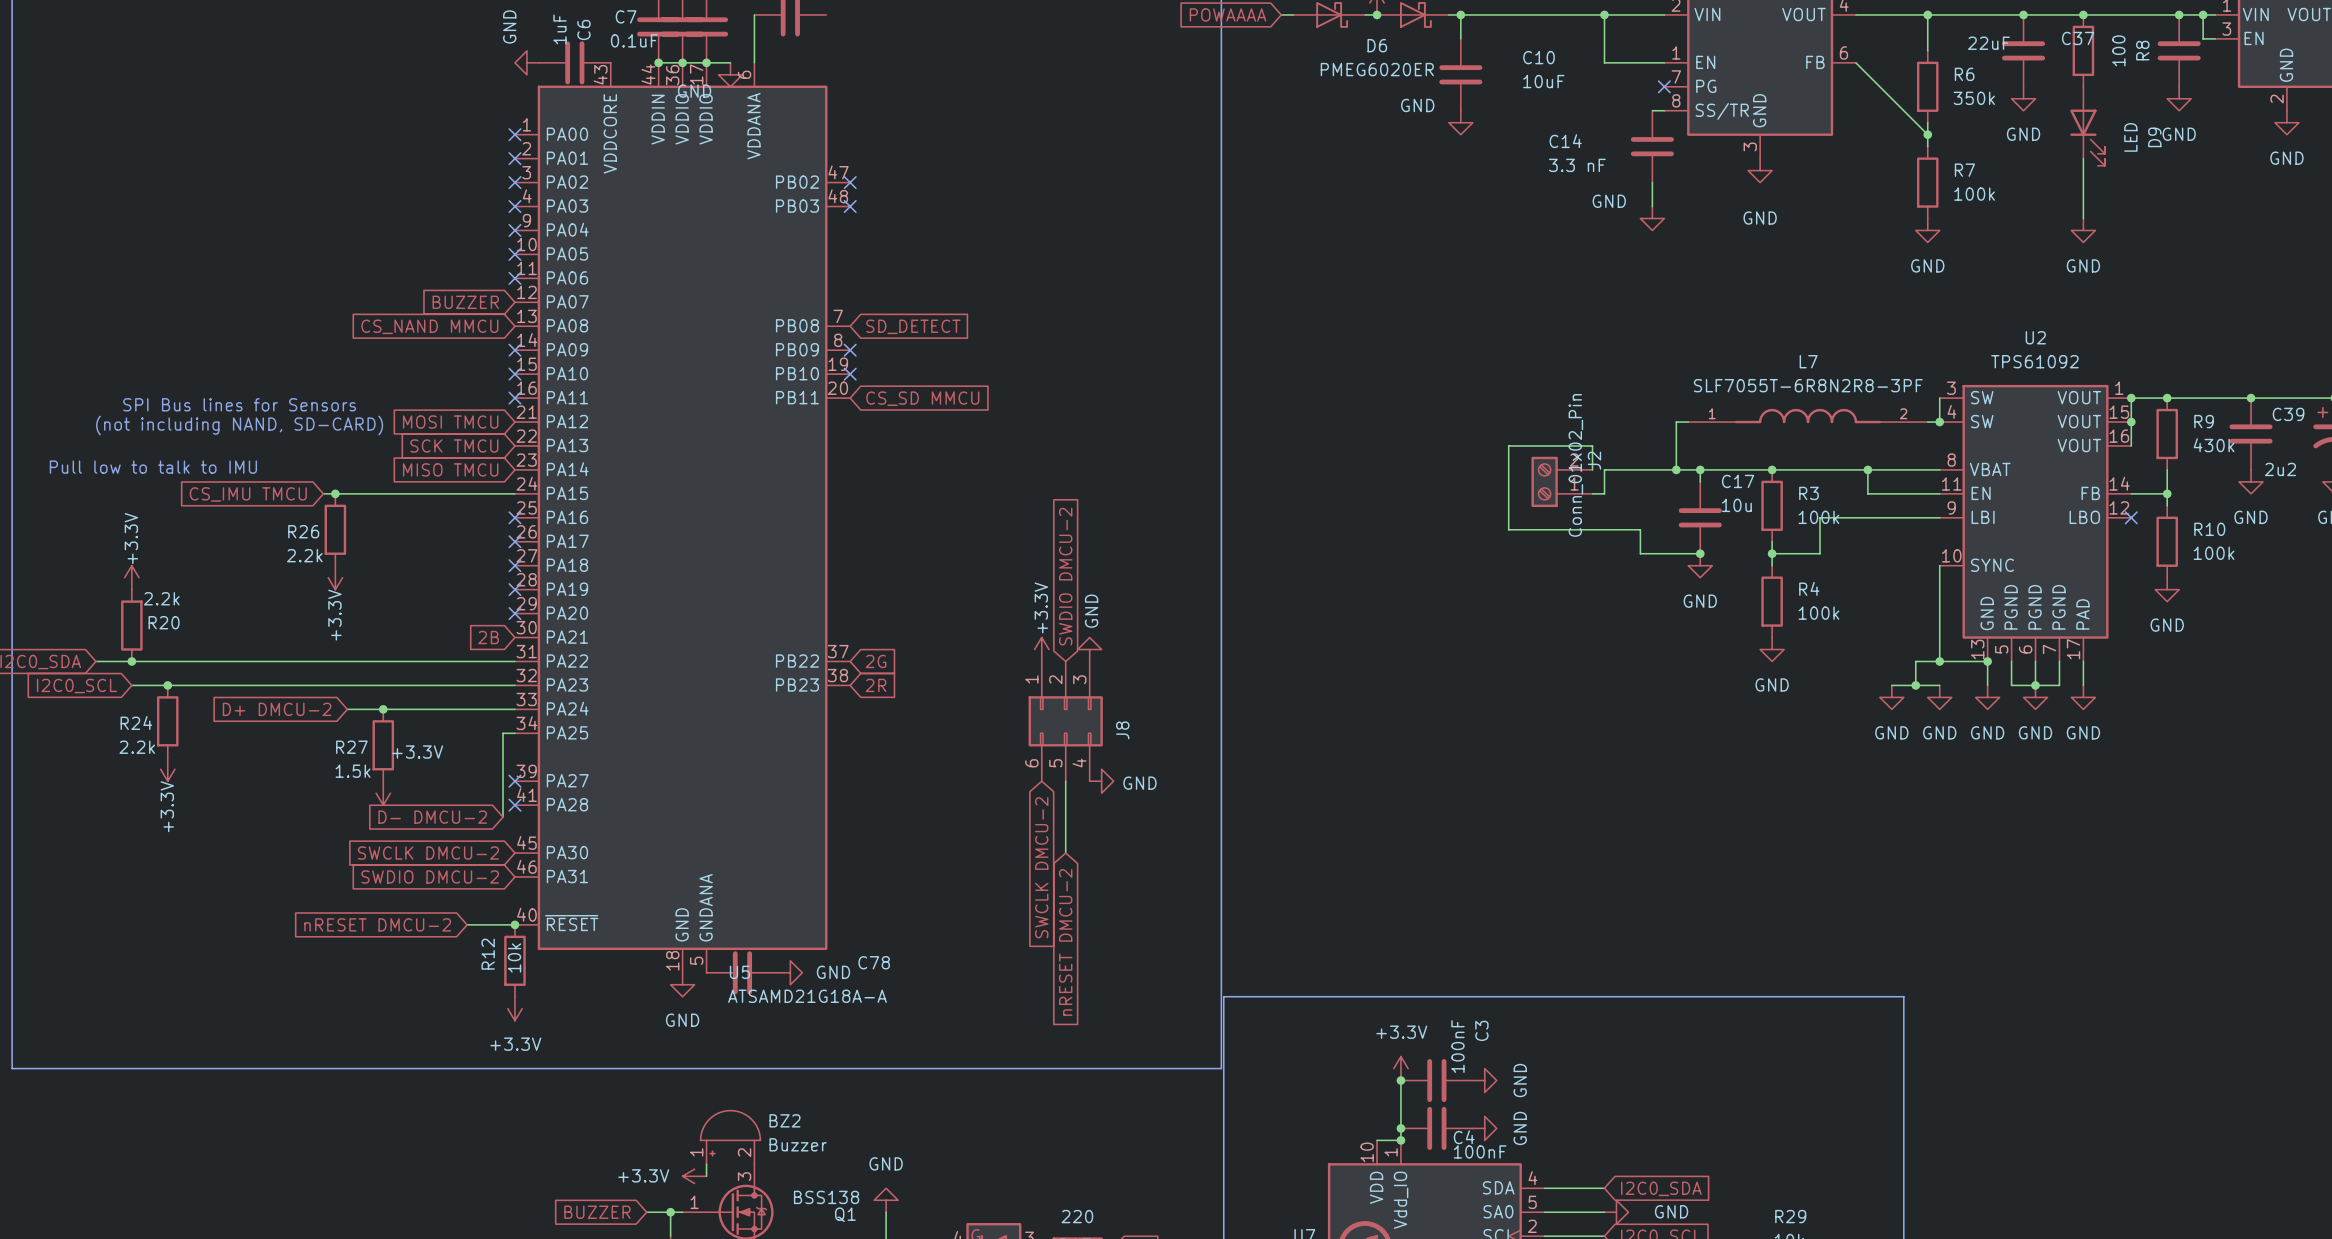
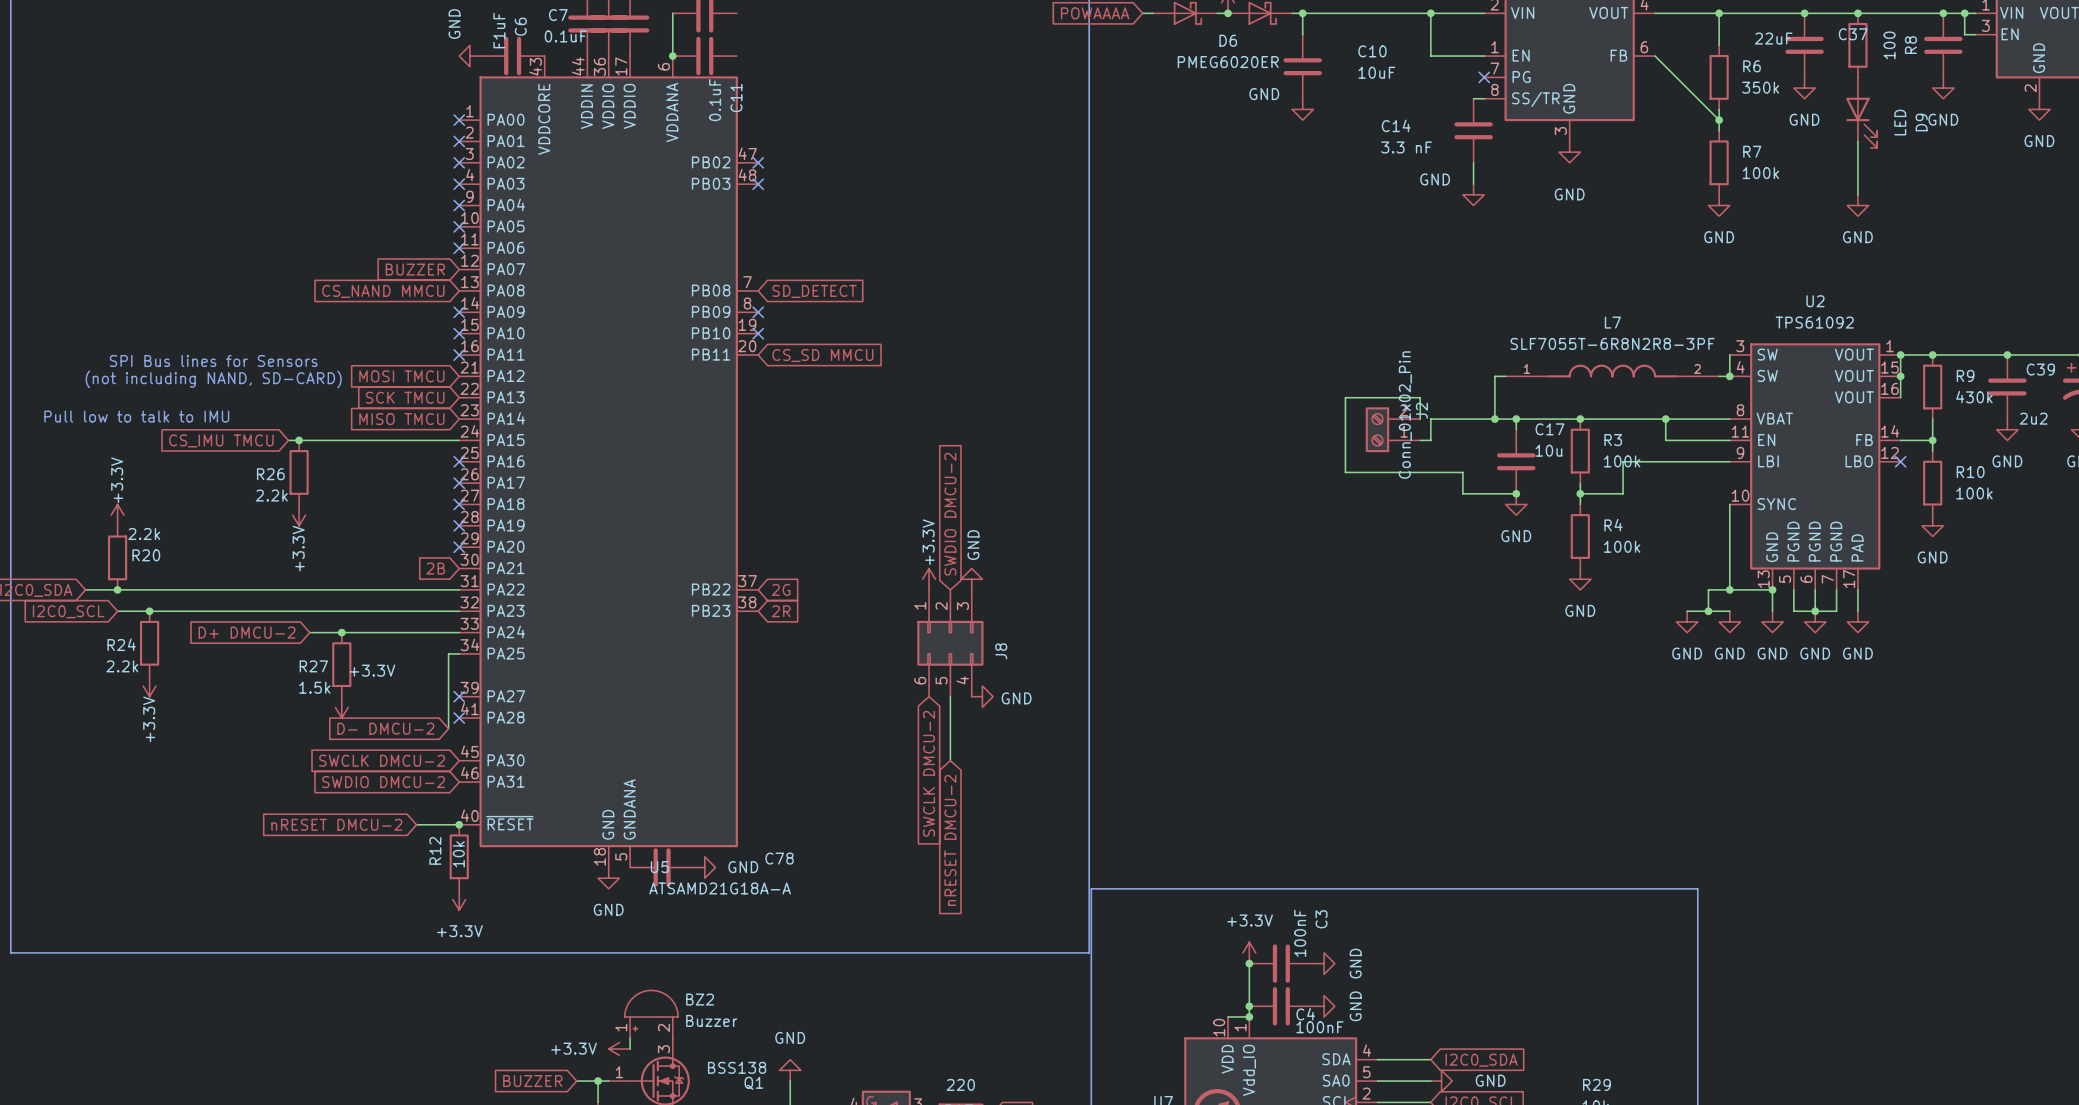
C6 value: 1uF (560, 29) -> F1uF (499, 30)
wire: (658, 62) (730, 62) -> none
junction: (658, 62) -> none
junction: (682, 62) -> none
junction: (706, 62) -> none
junction: none -> (672, 56)
C11: none -> 0.1uF (704, 56)
power symbol: GND (730, 74) -> none

